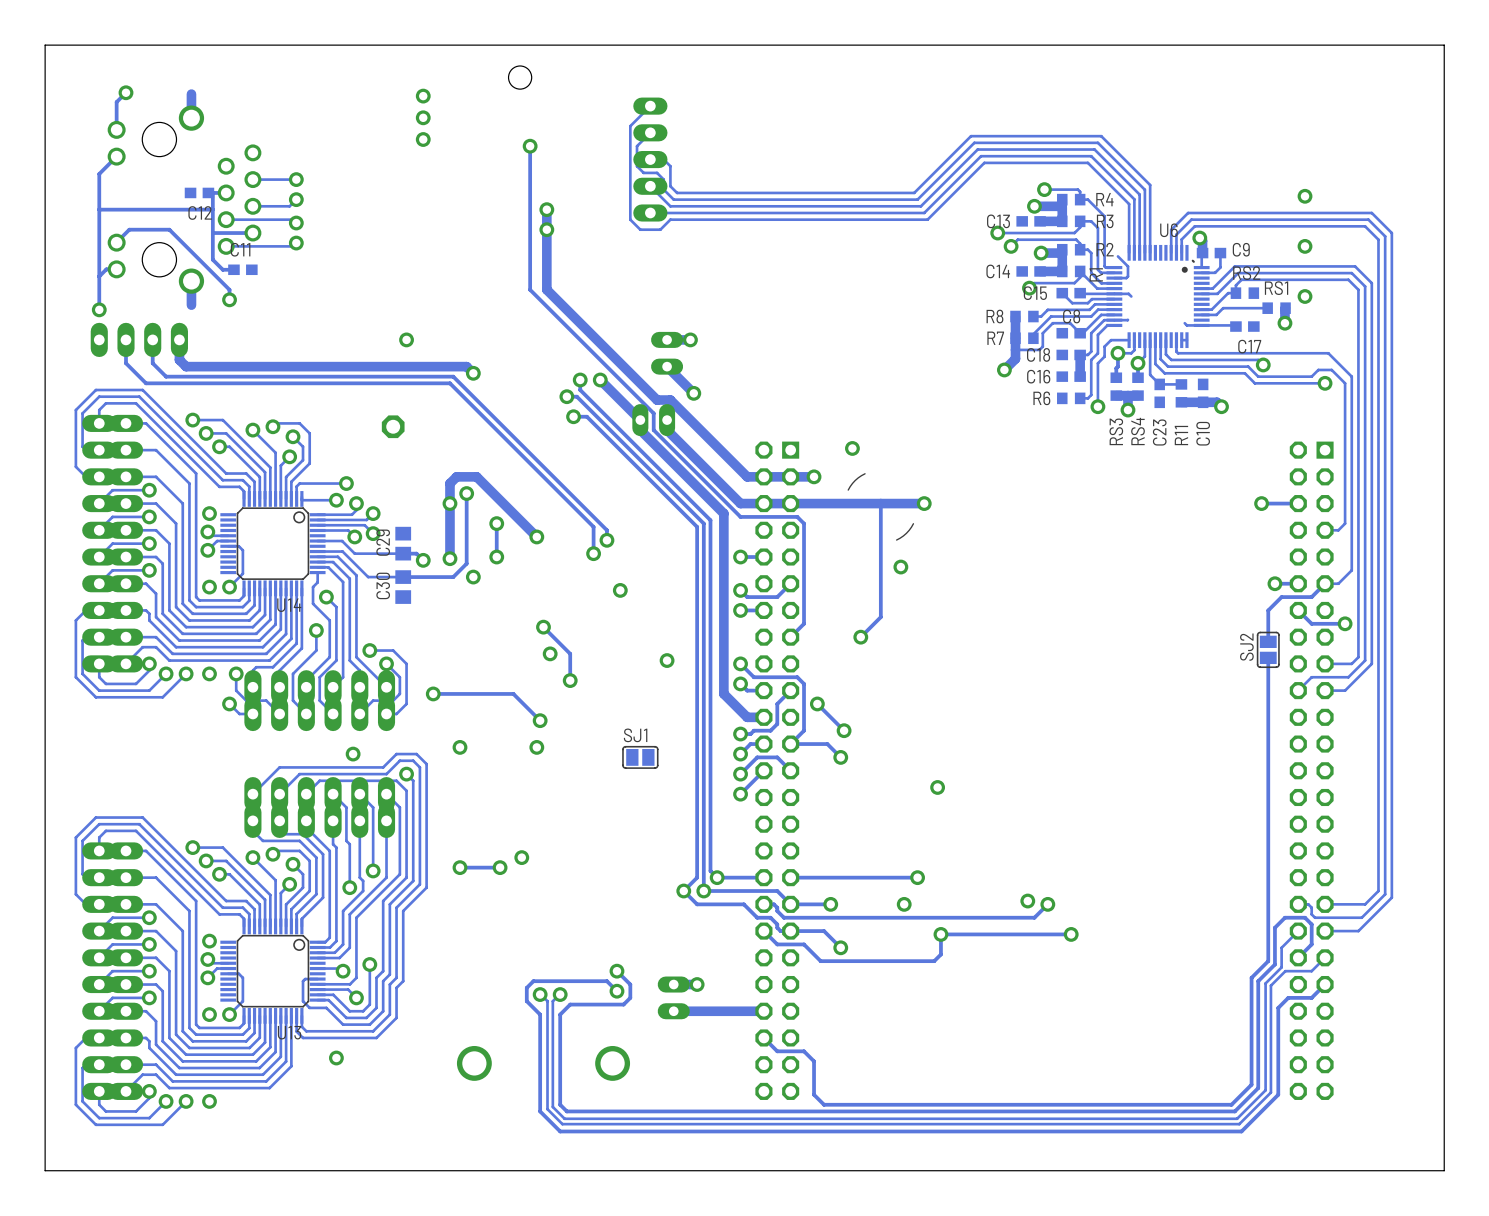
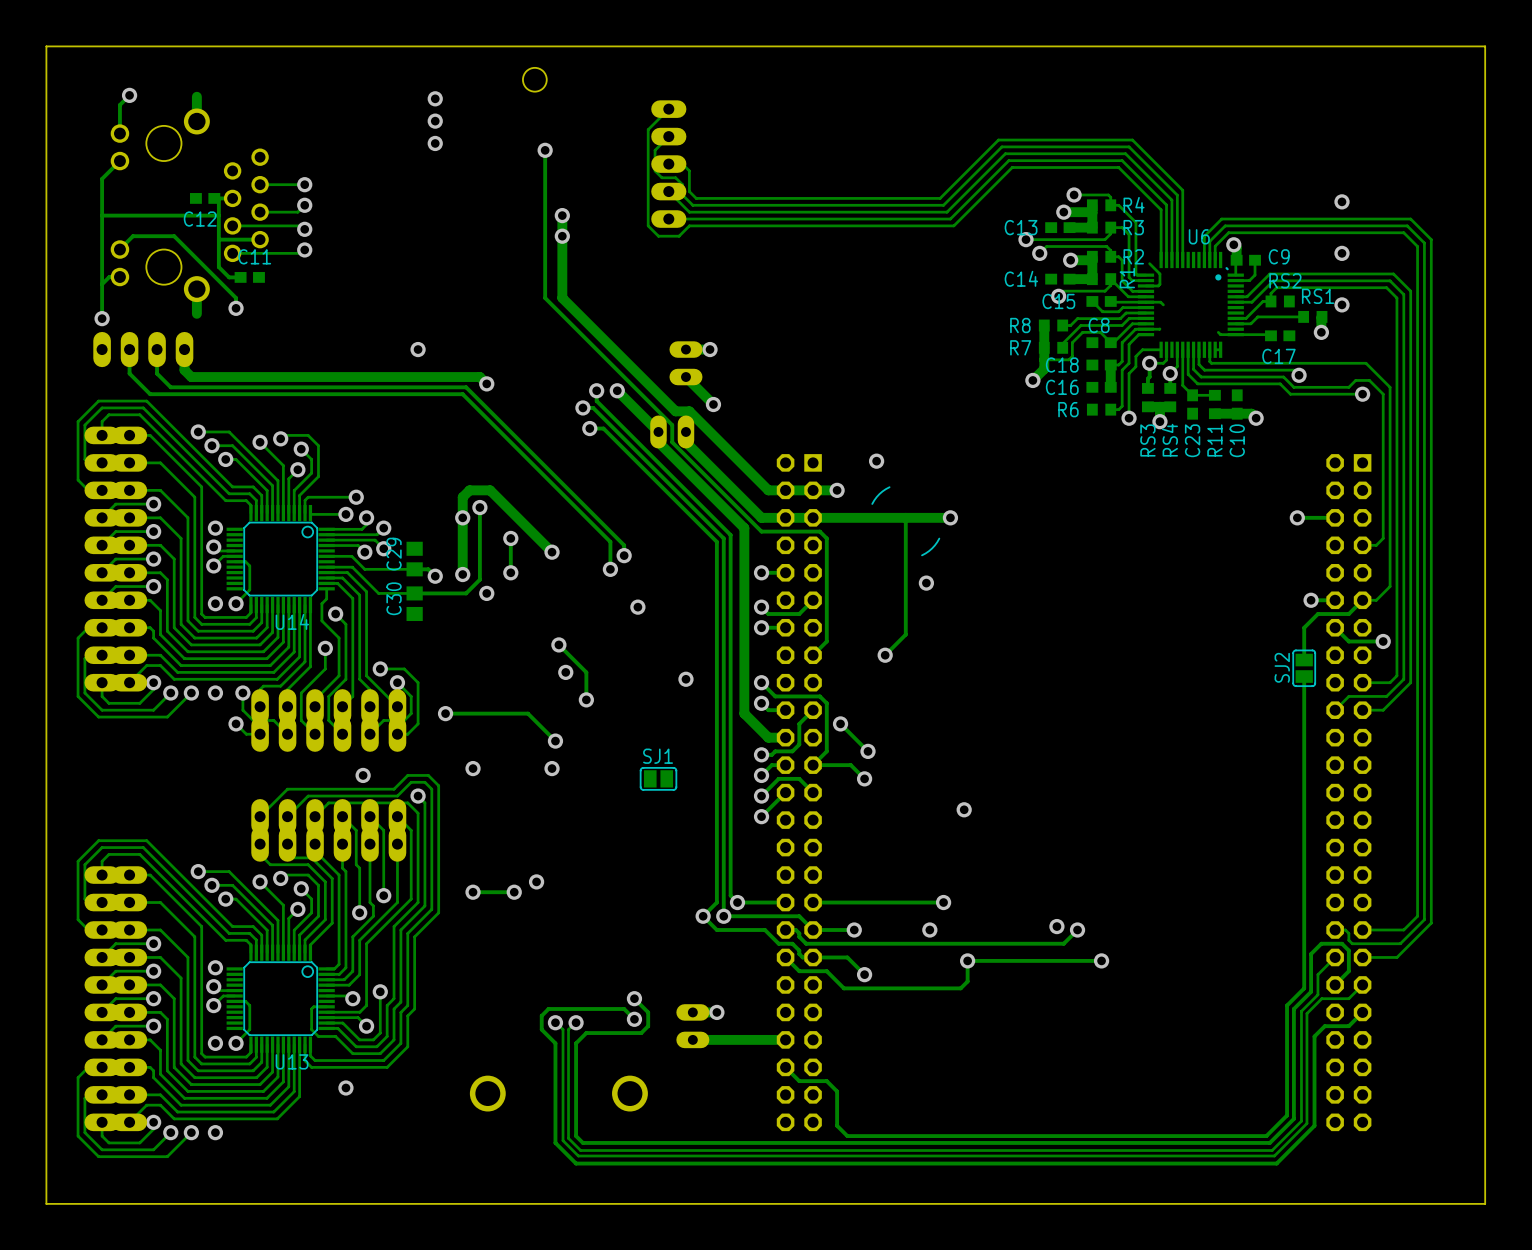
part: (393, 426) -> none

